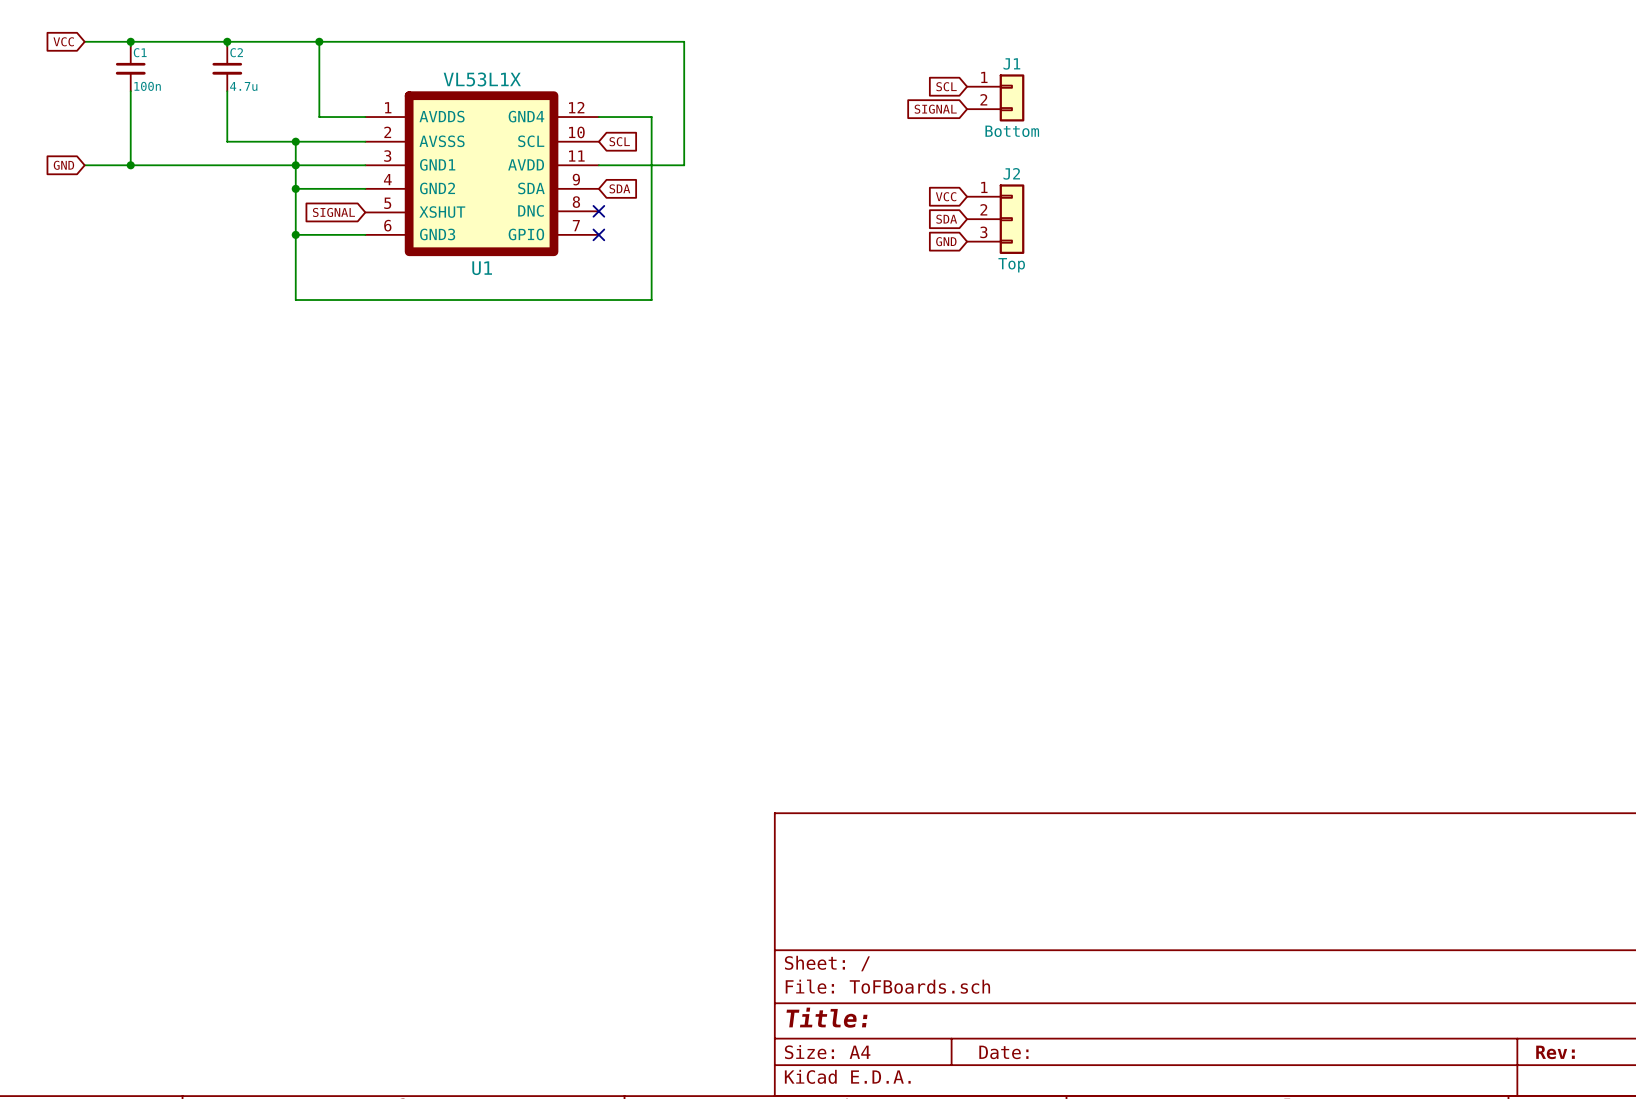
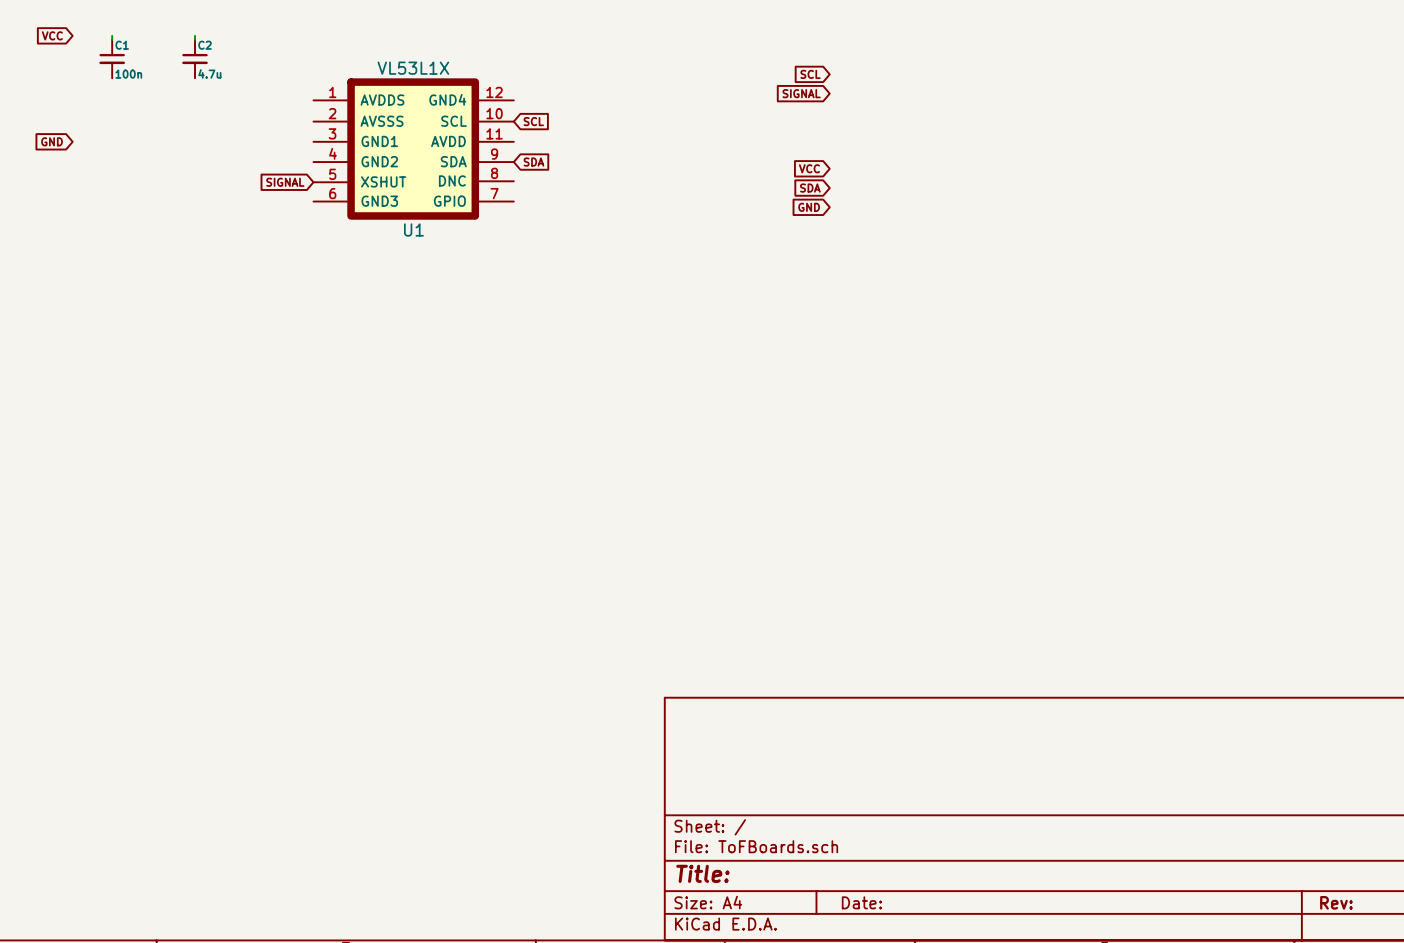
wire: (84, 41) (684, 41) (684, 165) (598, 165) -> none
junction: (130, 41) -> none
junction: (227, 41) -> none
wire: (319, 41) (319, 117) (365, 117) -> none
junction: (319, 41) -> none
wire: (130, 91) (130, 165) -> none
wire: (227, 91) (227, 141) (365, 141) -> none
J1: Bottom (995, 97) -> none
wire: (598, 117) (651, 117) (651, 300) (295, 300) (295, 141) -> none
junction: (295, 141) -> none
wire: (84, 165) (365, 165) -> none
junction: (130, 165) -> none
junction: (295, 165) -> none
wire: (295, 188) (365, 188) -> none
junction: (295, 188) -> none
no-connect mark: (598, 211) -> none
J2: Top (995, 219) -> none
wire: (295, 234) (365, 234) -> none
junction: (295, 234) -> none
no-connect mark: (598, 234) -> none

